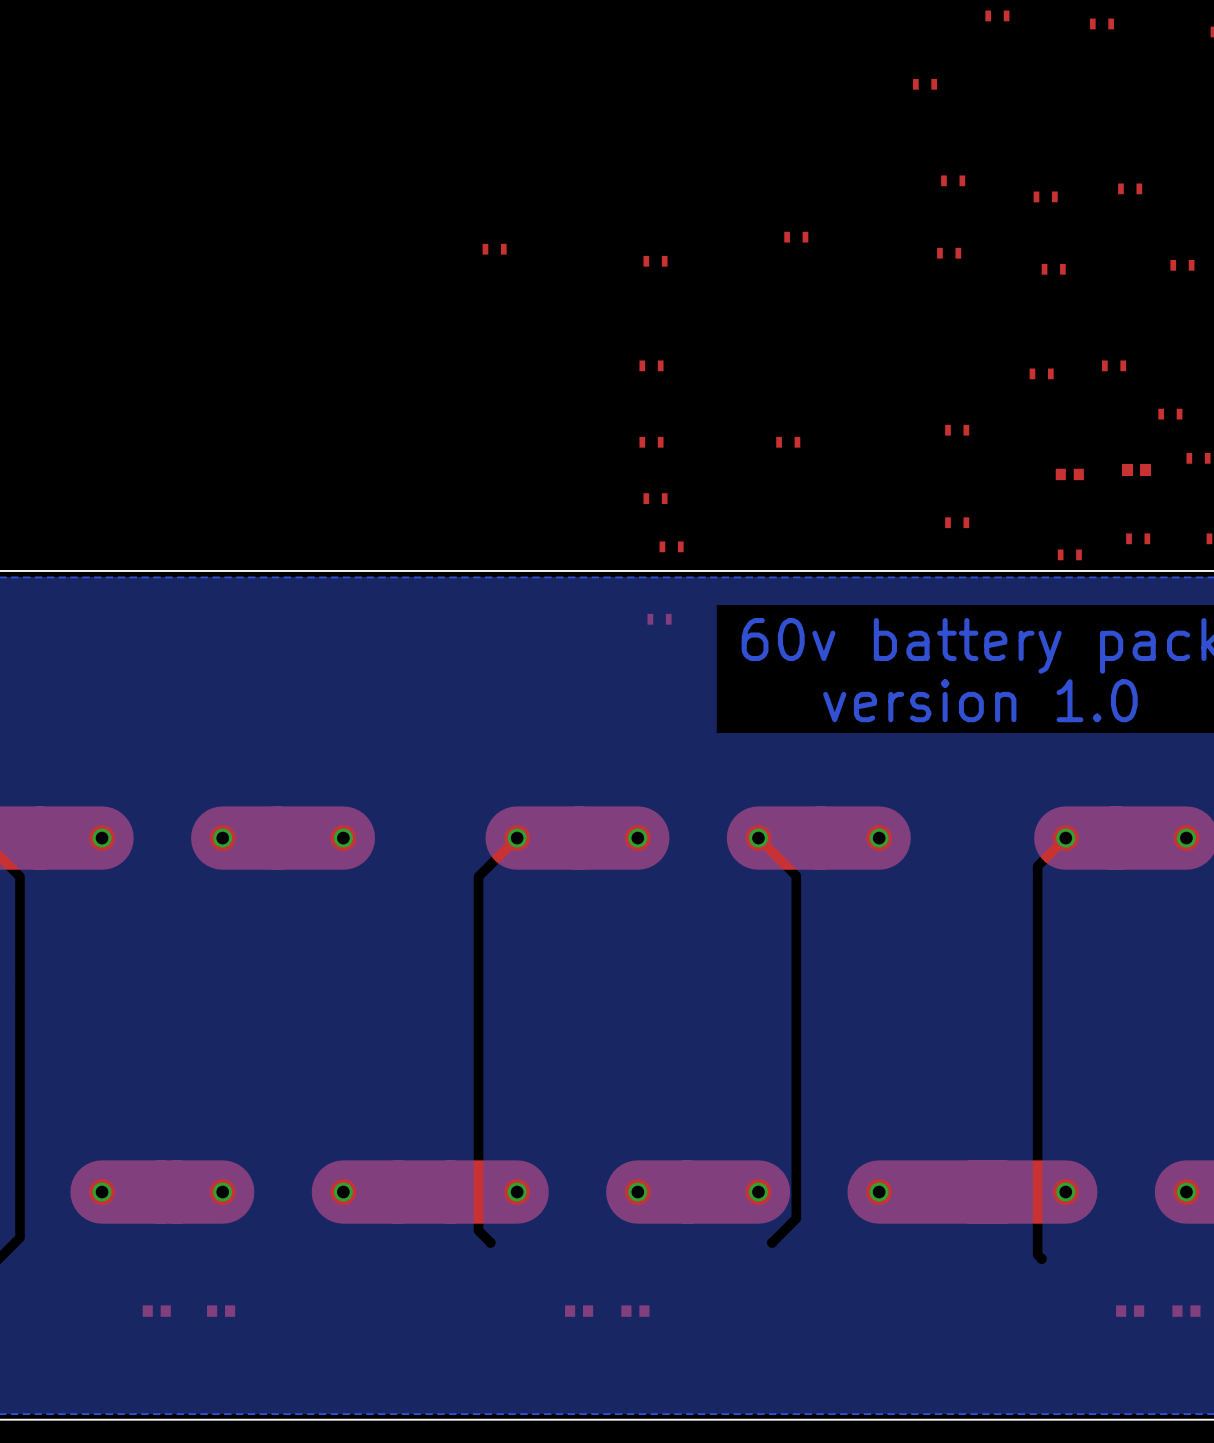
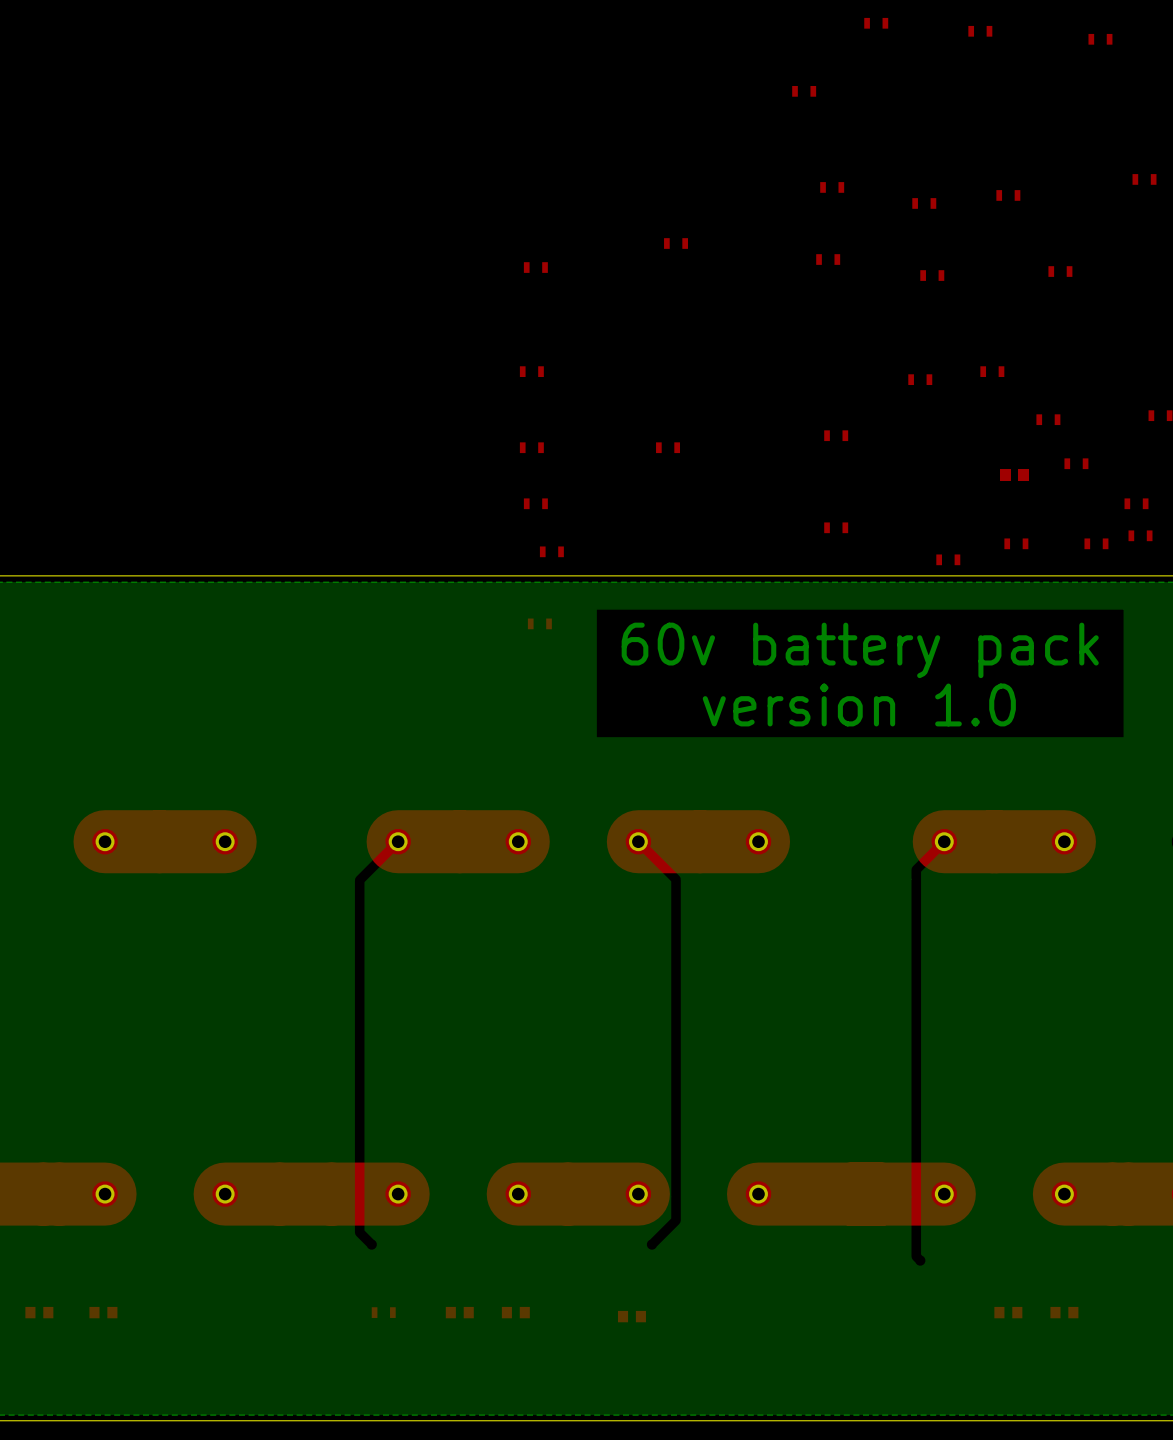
part: (494, 249) -> none
part: (1069, 474) -> none
part: none -> (383, 1312)
part: none -> (631, 1316)

